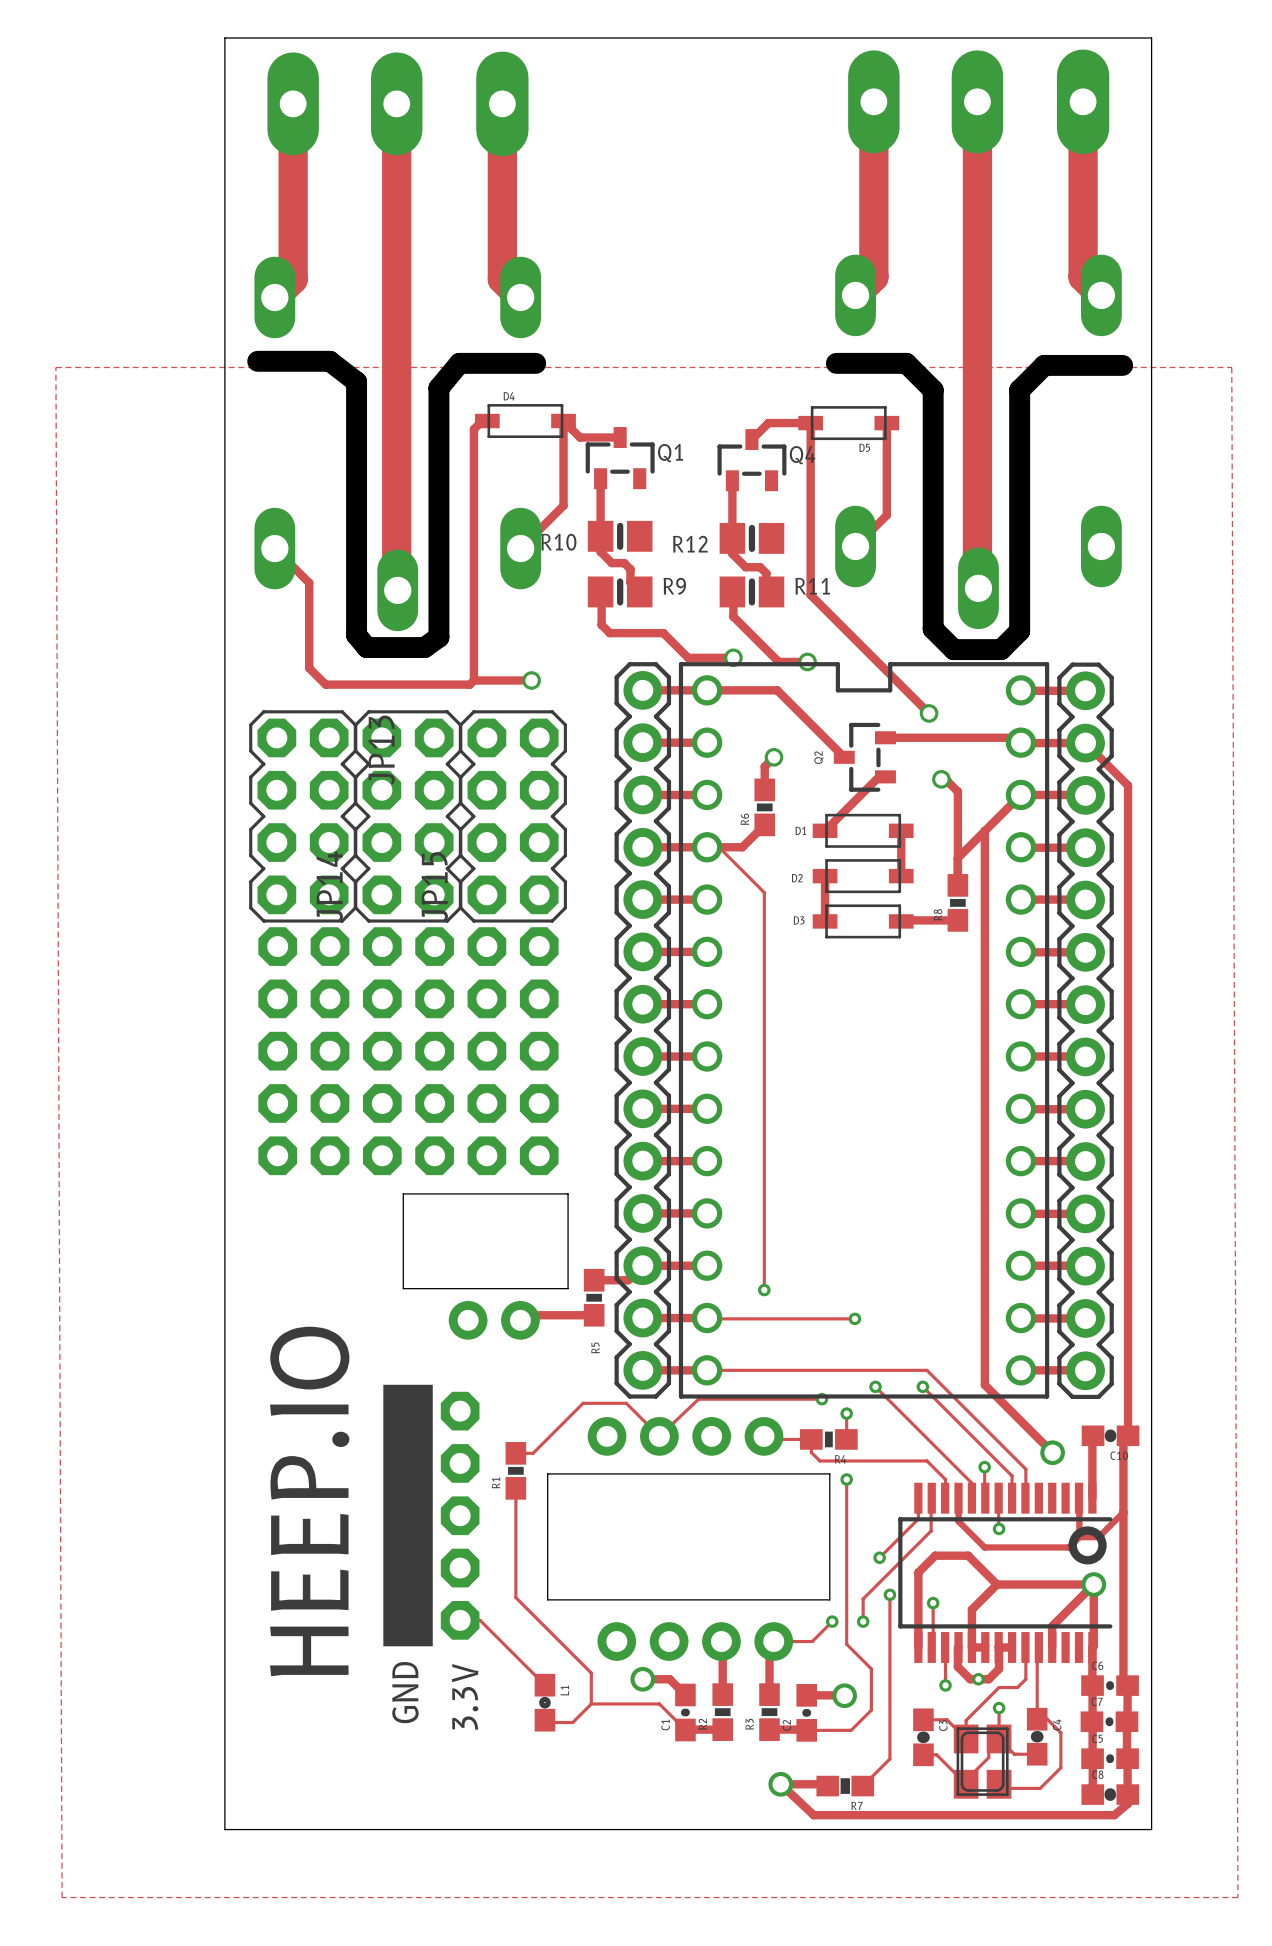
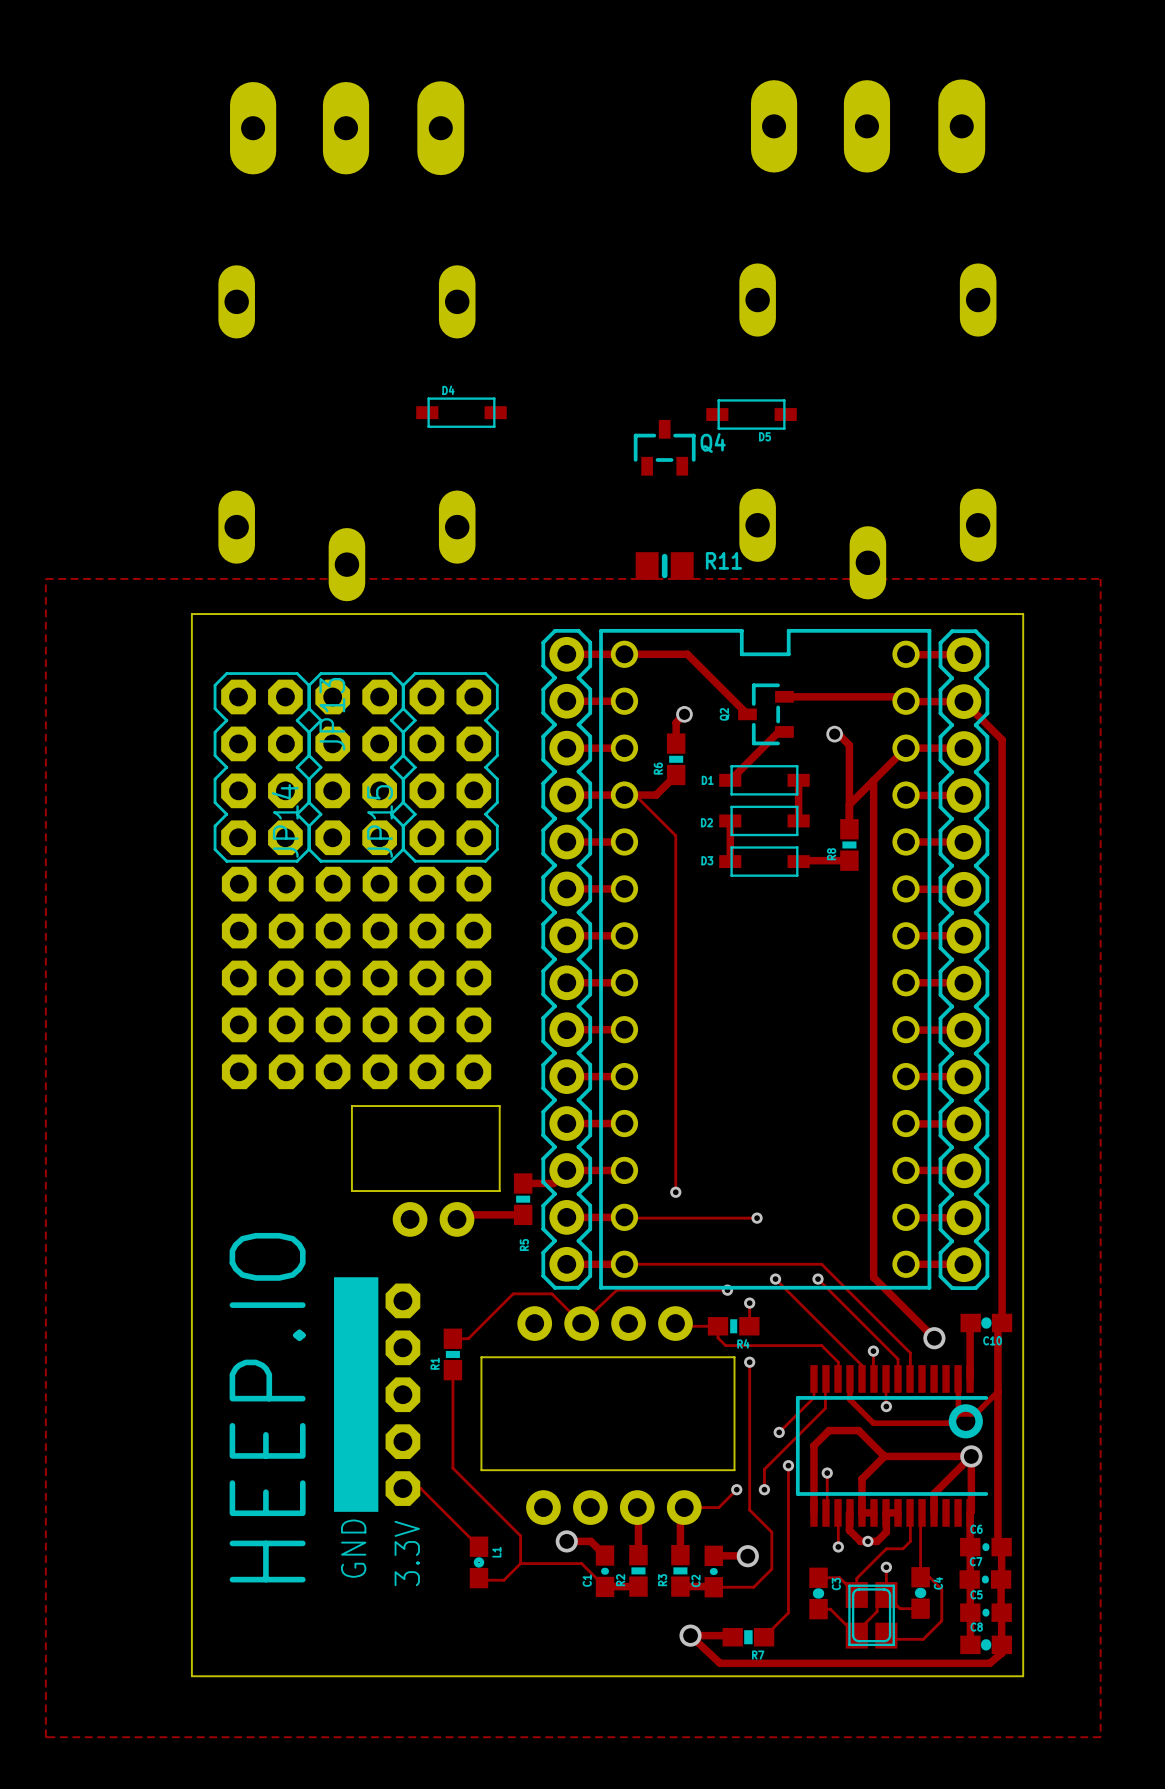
track: (873, 101) (873, 277) (855, 295) -> none
track: (977, 101) (978, 588) -> none
track: (1083, 101) (1083, 277) (1101, 295) -> none
track: (293, 103) (293, 279) (274, 297) -> none
track: (396, 103) (397, 590) -> none
track: (502, 103) (502, 279) (520, 297) -> none
board edge: (257, 361) (329, 361) (356, 381) (356, 635) (366, 647) (424, 647) (438, 637) (438, 388) (459, 363) (535, 363) -> none
board edge: (836, 363) (906, 363) (933, 390) (933, 629) (953, 649) (1001, 649) (1019, 631) (1019, 390) (1044, 365) (1122, 365) -> none
track: (487, 421) (482, 421) (473, 429) (473, 680) -> none
track: (886, 423) (886, 515) (855, 546) -> none
track: (620, 437) (580, 437) (563, 421) (563, 505) (520, 548) -> none
track: (751, 439) (768, 423) (810, 423) (810, 595) (929, 713) -> none
Q1: (620, 458) -> none
track: (600, 478) (600, 551) (611, 563) (624, 563) (630, 569) (630, 582) (639, 591) -> none
track: (732, 480) (732, 553) (745, 567) (760, 567) (766, 573) (766, 586) (771, 591) -> none
R10: (620, 536) -> none
R12: (751, 538) -> none
track: (274, 548) (309, 582) (309, 668) (325, 684) (469, 684) (473, 680) -> none
track: (600, 591) (601, 624) (609, 633) (663, 633) (688, 657) (733, 657) -> none
R9: (620, 591) -> none
track: (732, 591) (733, 616) (778, 661) (807, 661) -> none
board edge: (224, 645) (224, 37) (1151, 37) (1151, 645) -> (191, 614) (1023, 614)
via: (733, 657) -> none
via: (807, 661) -> none
track: (473, 680) (531, 680) -> none
via: (531, 680) -> none
via: (929, 713) -> none
zone outline: (62, 1897) (55, 367) (1231, 367) (1237, 1897) -> (45, 1737) (45, 578) (1100, 578) (1100, 1737)

